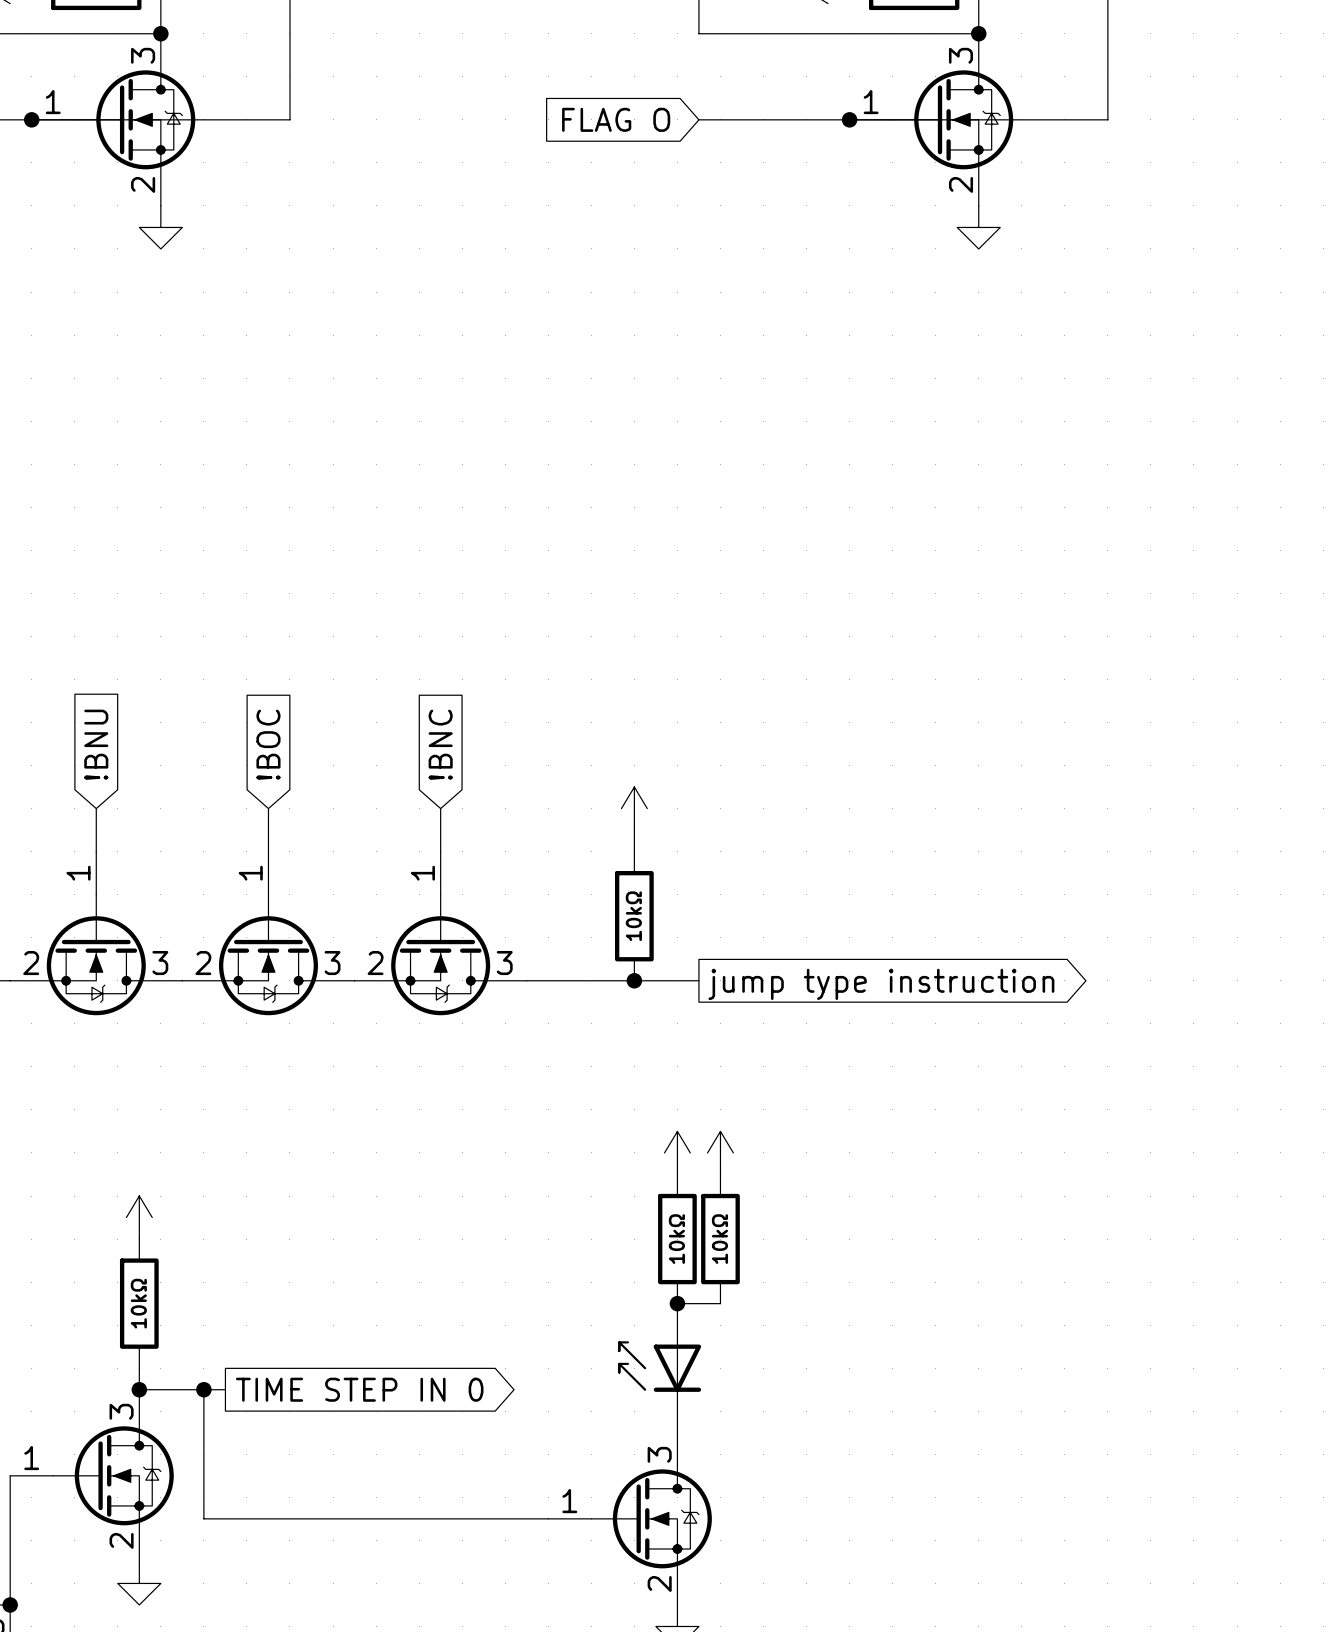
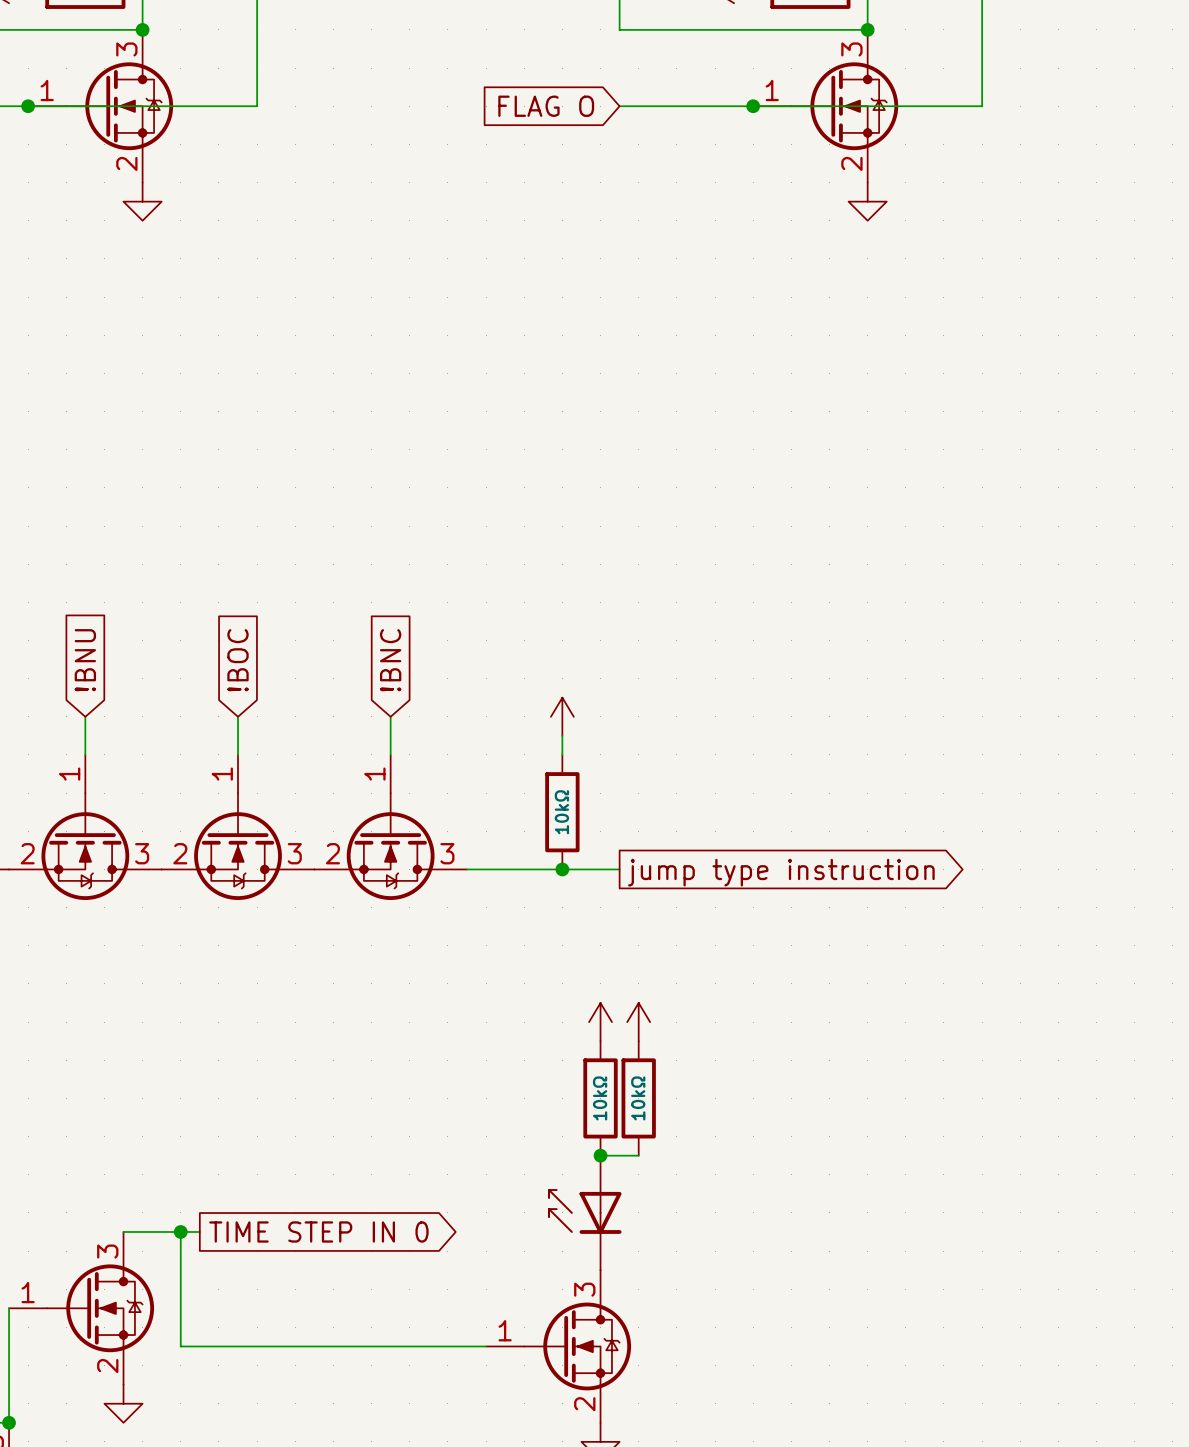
power symbol: (139, 1217) -> none
part: 10kΩ (139, 1303) -> none
wire: (139, 1368) (139, 1389) -> none
junction: (139, 1389) -> none

